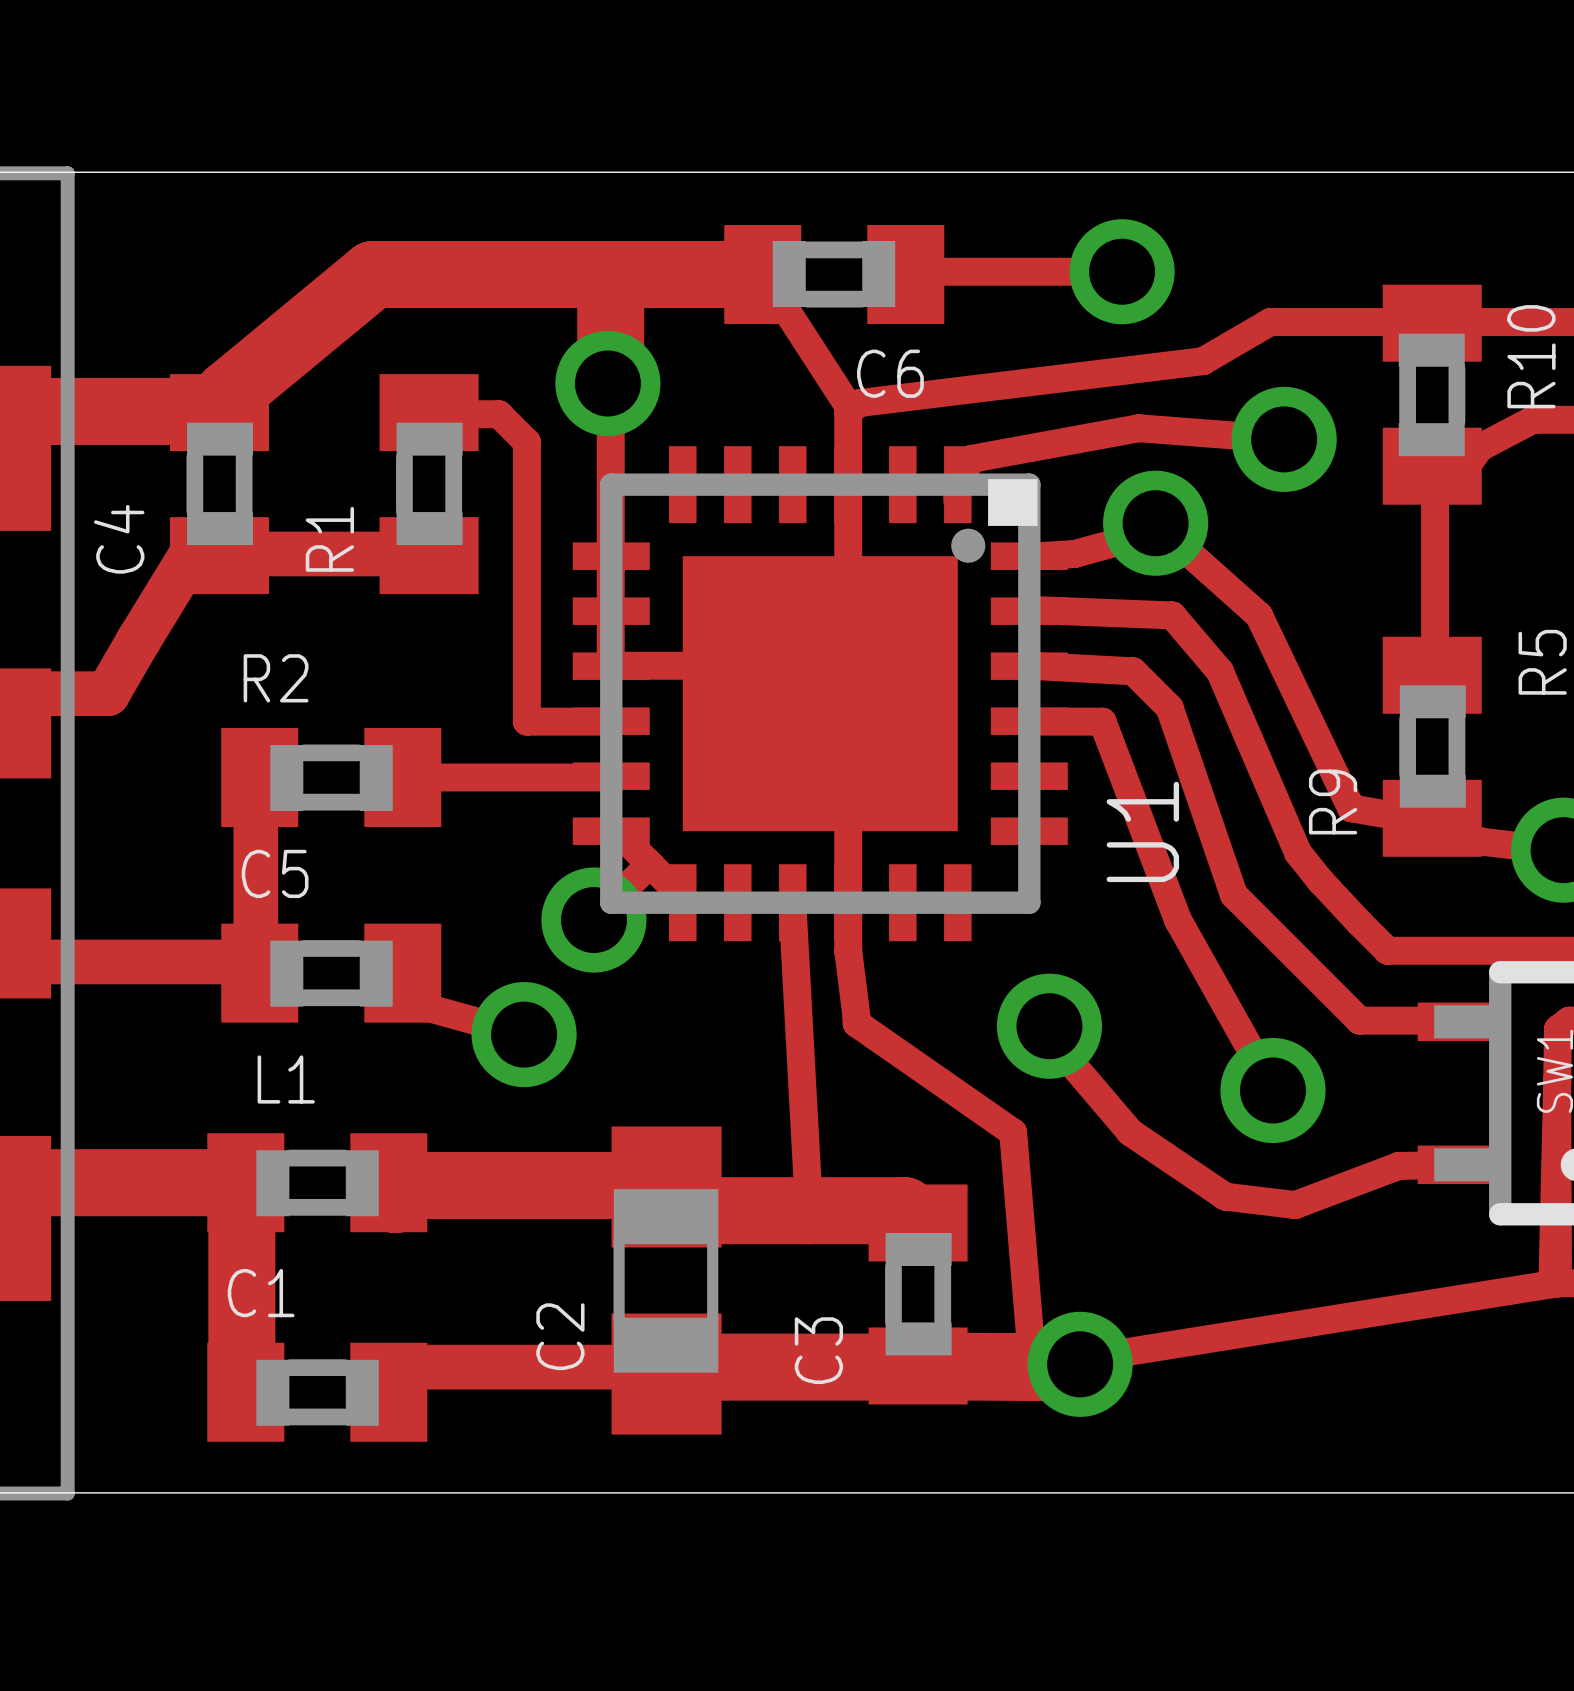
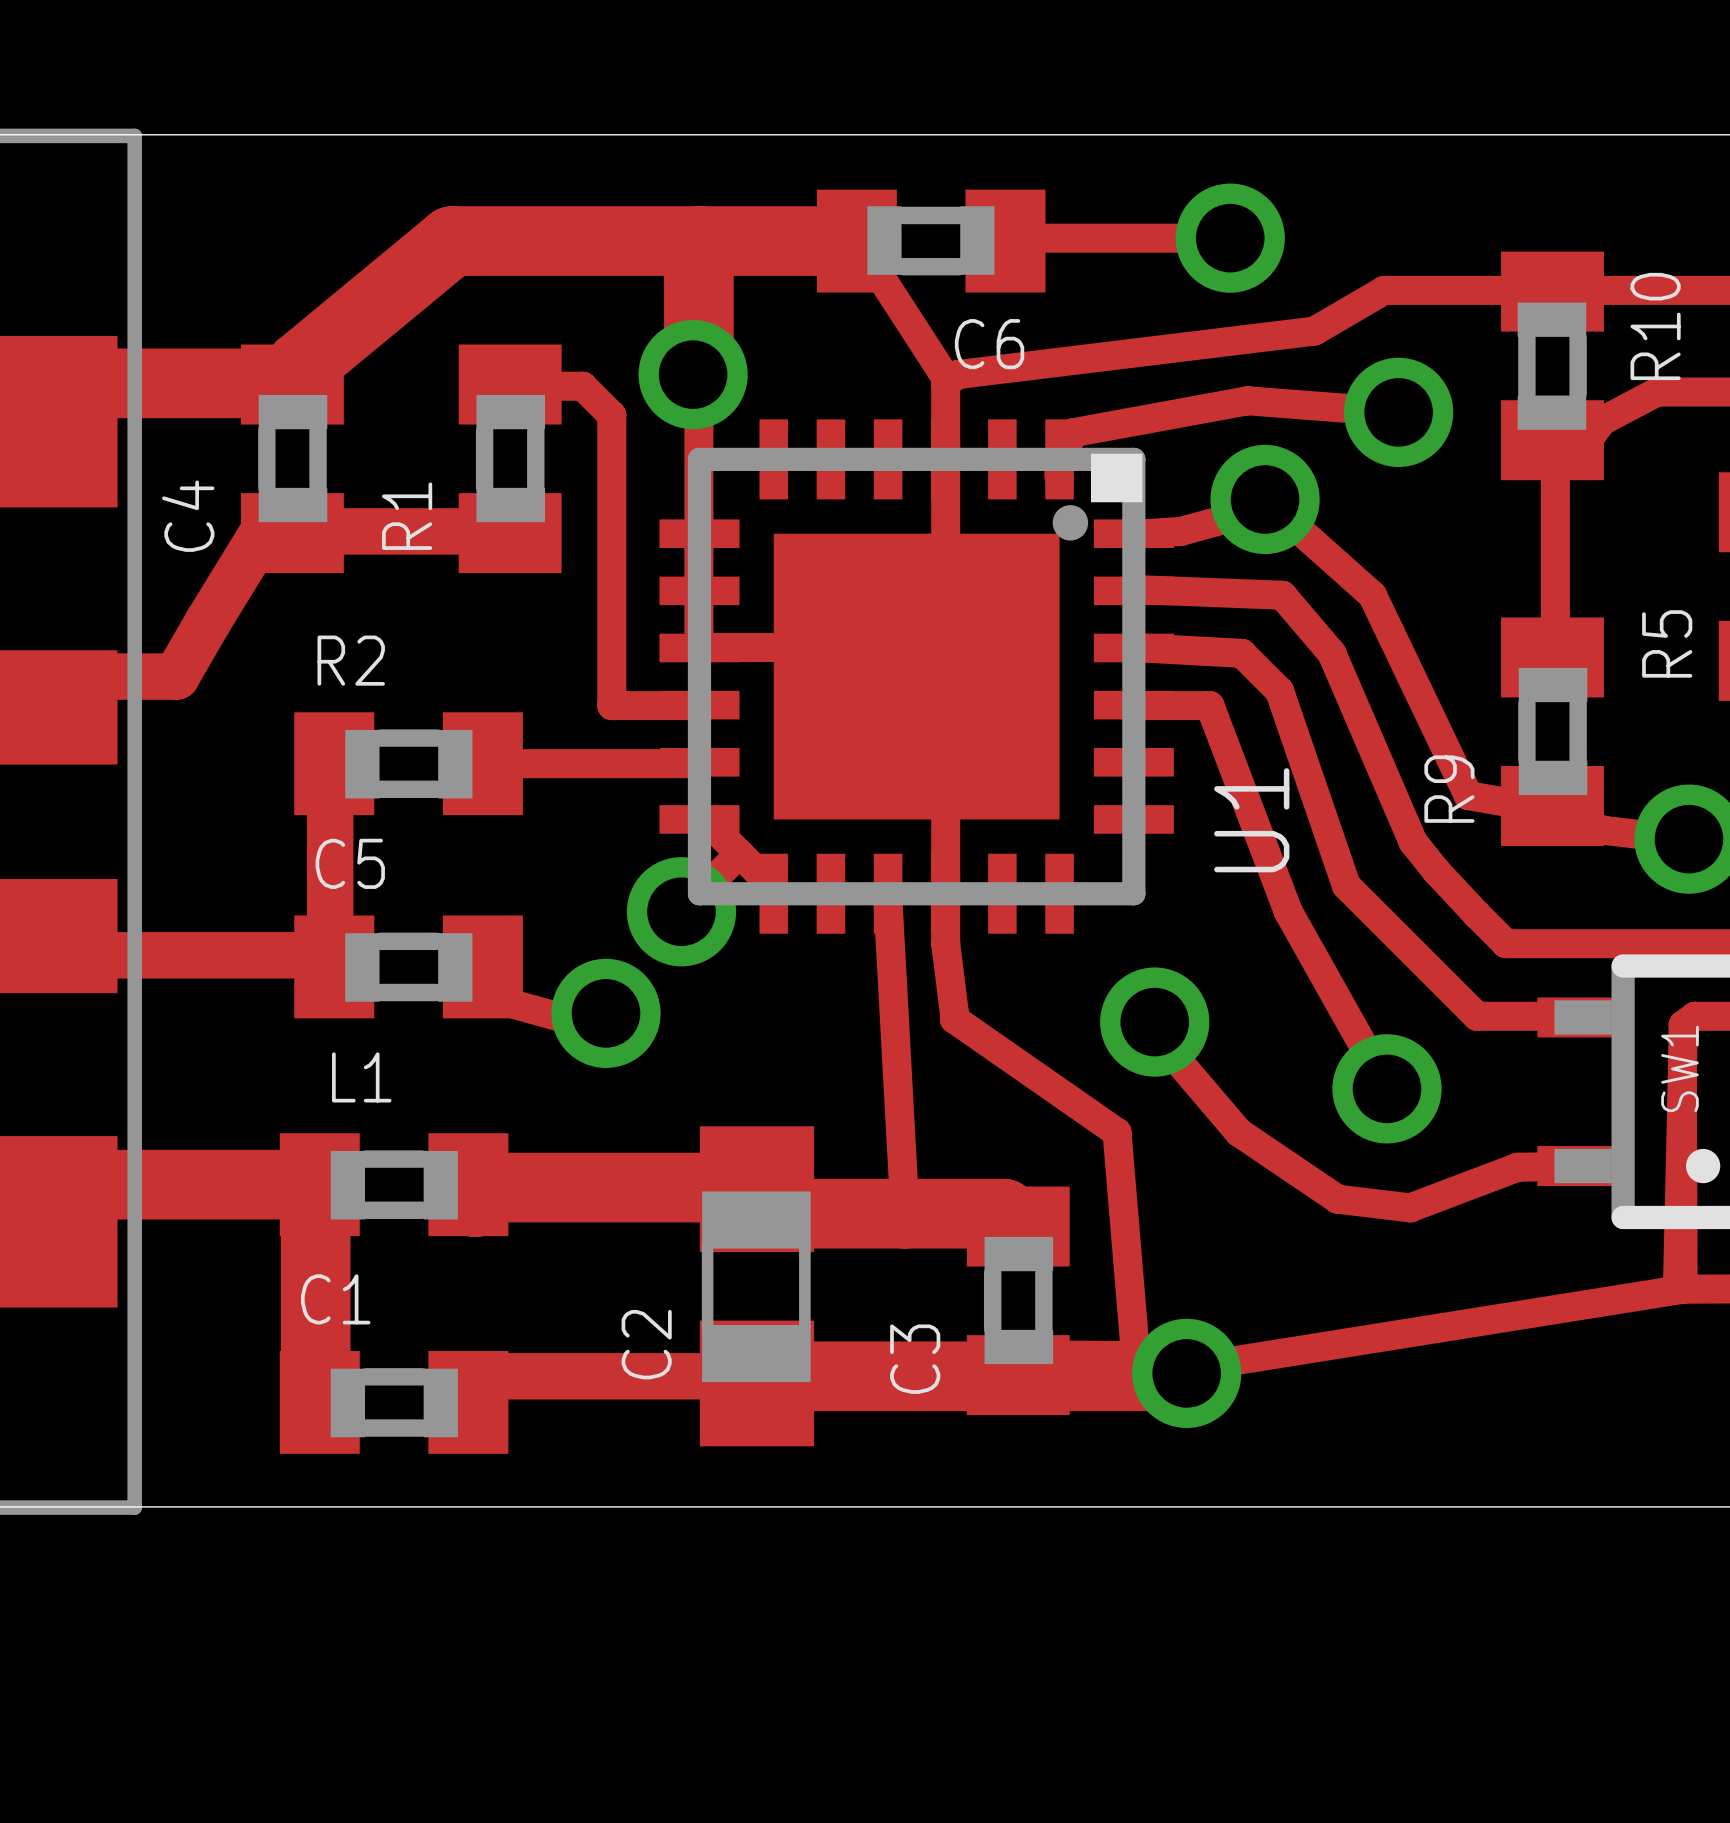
via position: (607, 383) -> (693, 374)
via position: (524, 1034) -> (606, 1013)

